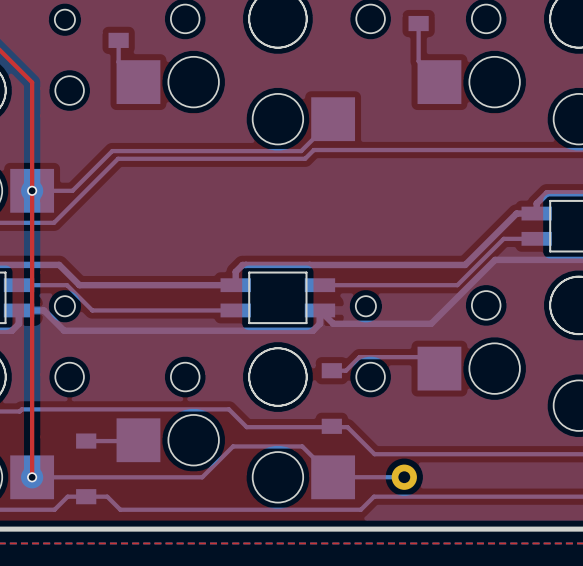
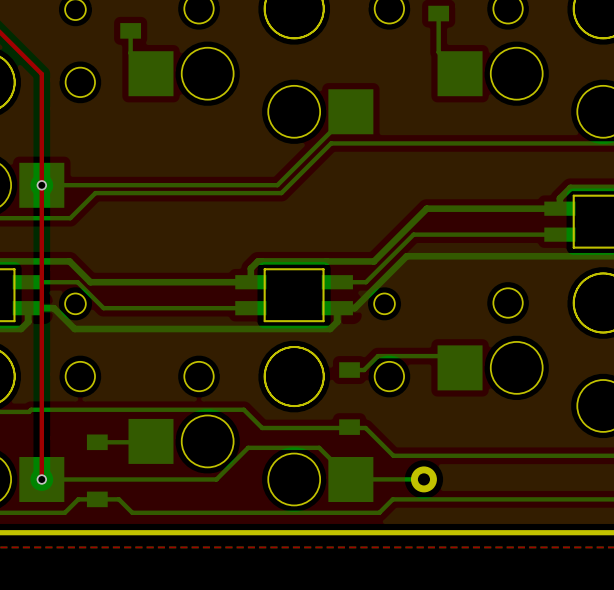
bottom track: (301, 151) (112, 151) (72, 190) (32, 190) -> (318, 144) (277, 185) (41, 185)
bottom track: (305, 158) (118, 158) (54, 222) -> (322, 152) (281, 193) (95, 193) (70, 218) (64, 218)
bottom track: (516, 213) (465, 264) (355, 264) -> (539, 208) (426, 208) (374, 261)
bottom track: (503, 238) (457, 285) (347, 285) -> (526, 234) (413, 234) (366, 282)
bottom track: (495, 259) (431, 323) (333, 323) (319, 310) -> (517, 256) (406, 256) (354, 308) (337, 308)

